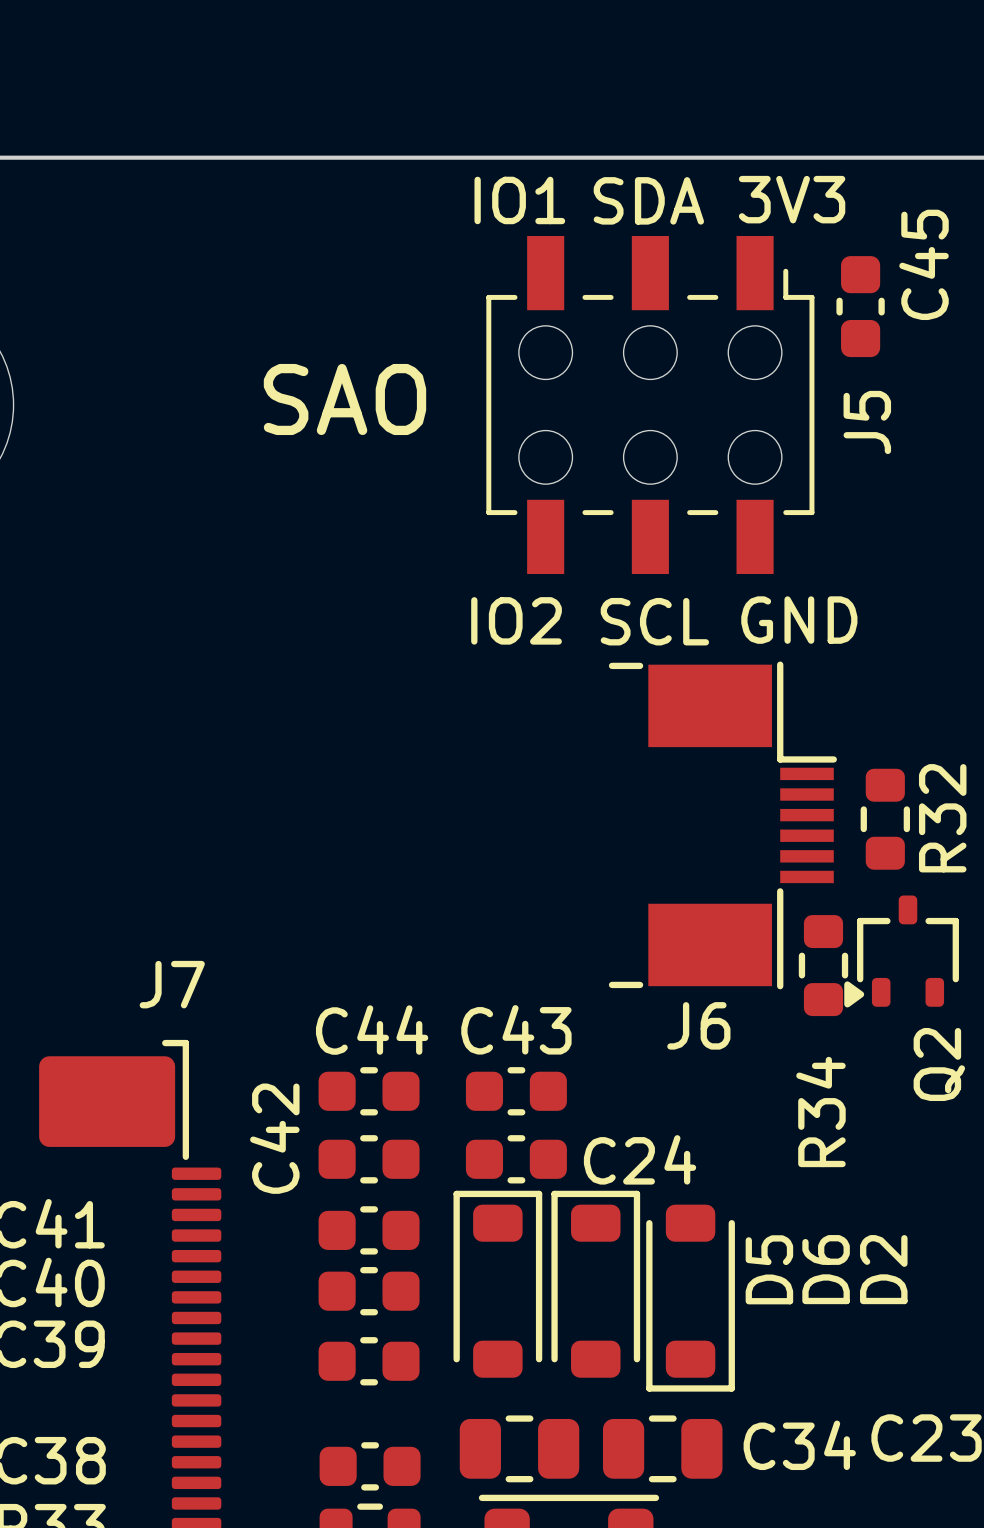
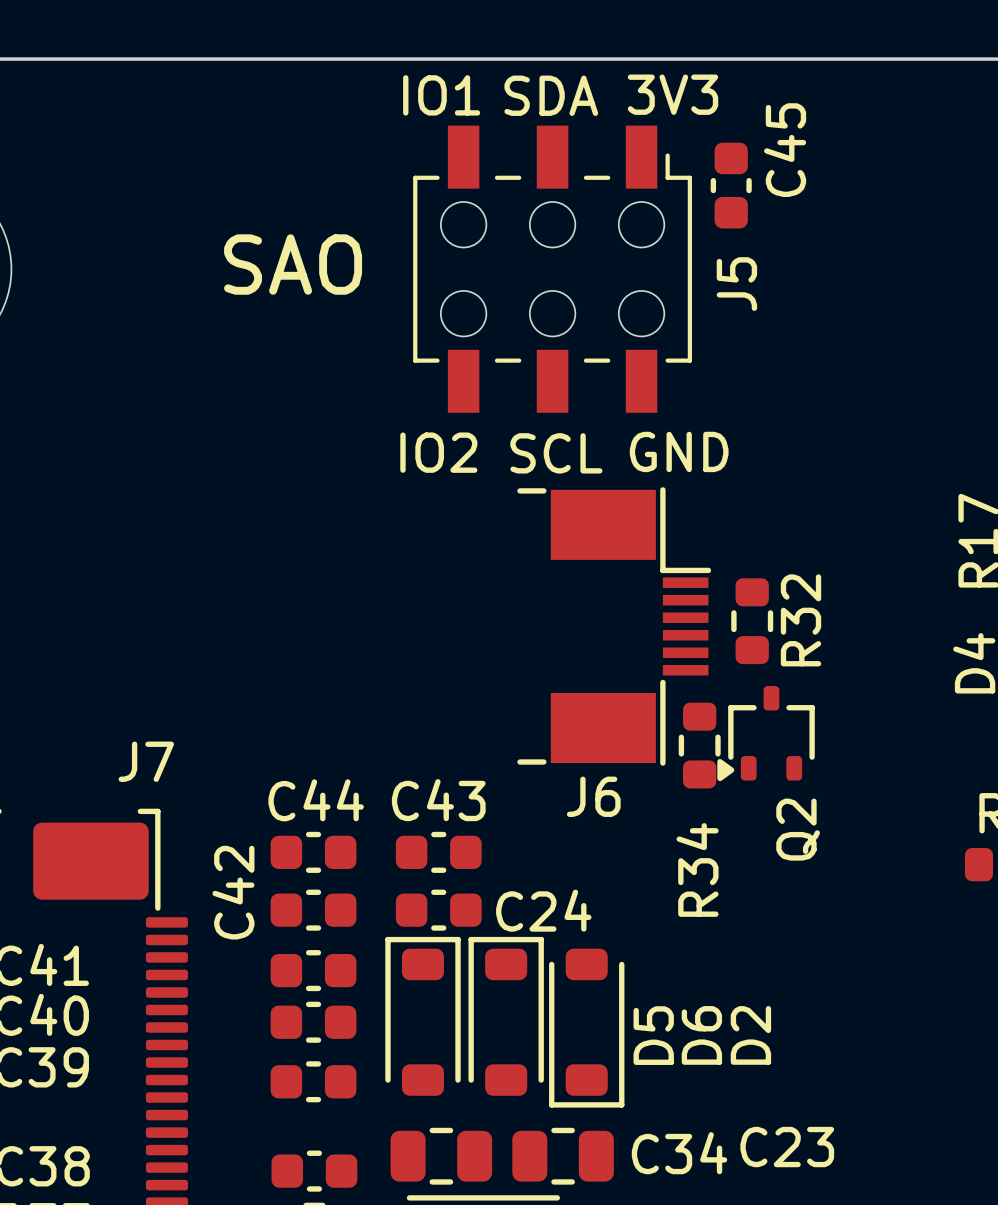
D5 name position: D5 (769, 1269) -> D5 (653, 1035)
D6 name position: D6 (826, 1269) -> D6 (701, 1035)
D2 name position: D2 (883, 1269) -> D2 (750, 1035)

